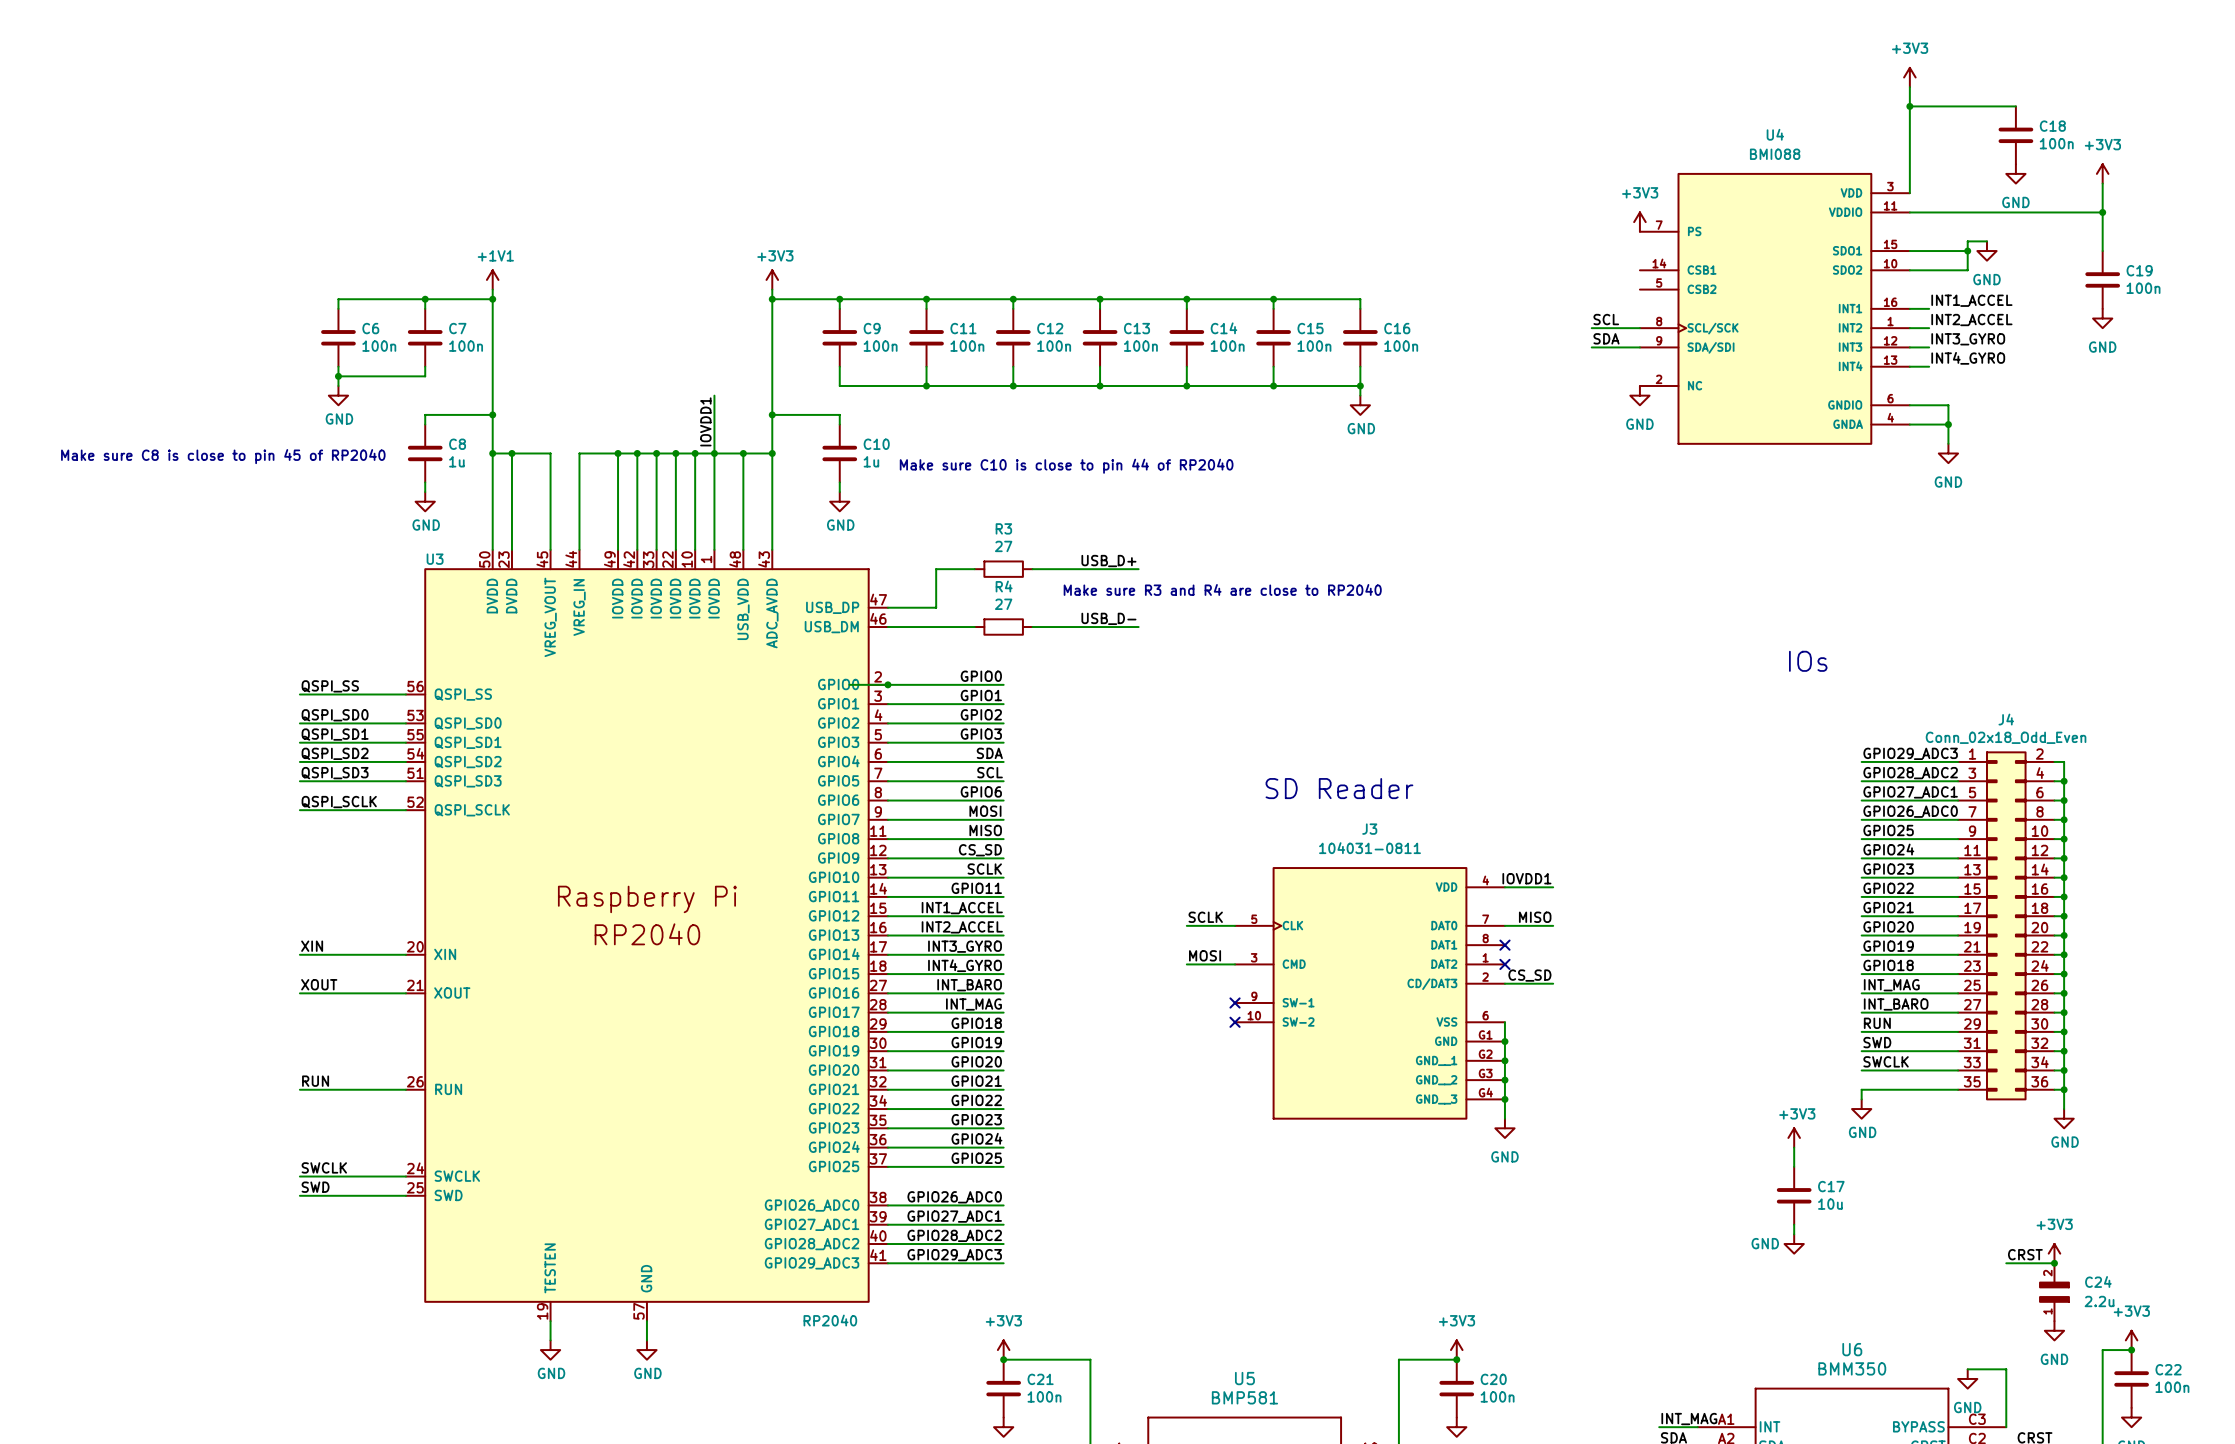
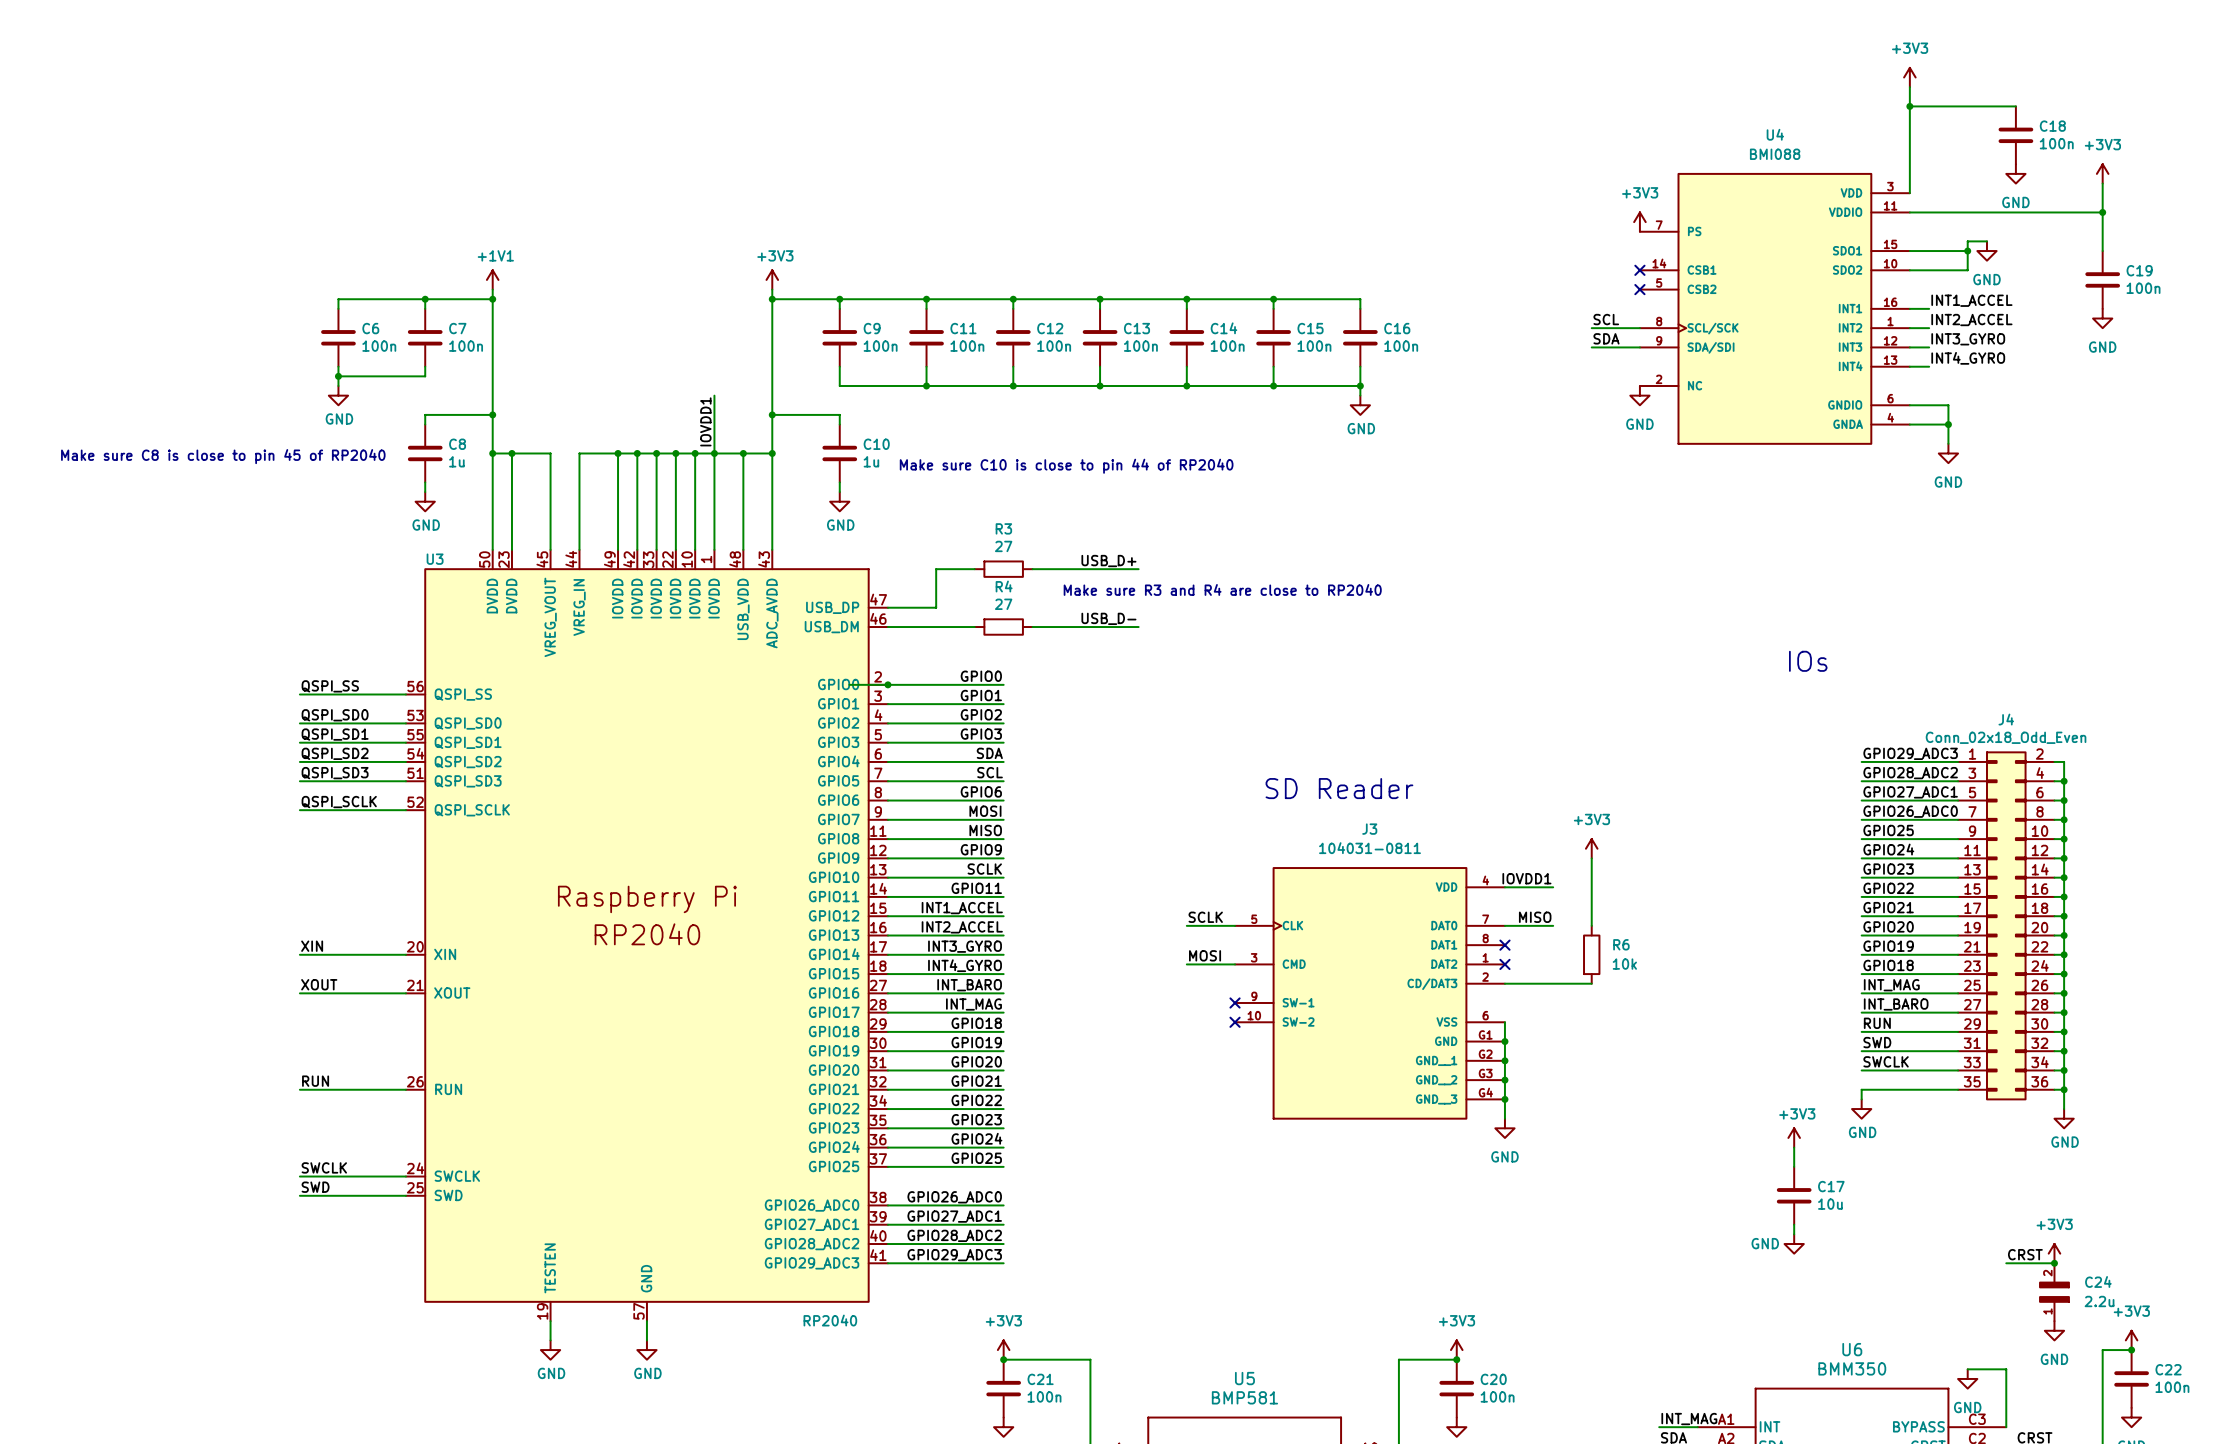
no-connect mark: none -> (1639, 270)
no-connect mark: none -> (1639, 289)
power symbol: none -> +3V3 (1591, 848)
label: CS_SD (980, 850) -> GPIO9 (981, 849)
wire: none -> (1591, 858) (1591, 925)
R6: none -> 10k (1591, 954)
label: CS_SD (1529, 975) -> none
wire: none -> (1553, 983) (1591, 983)

